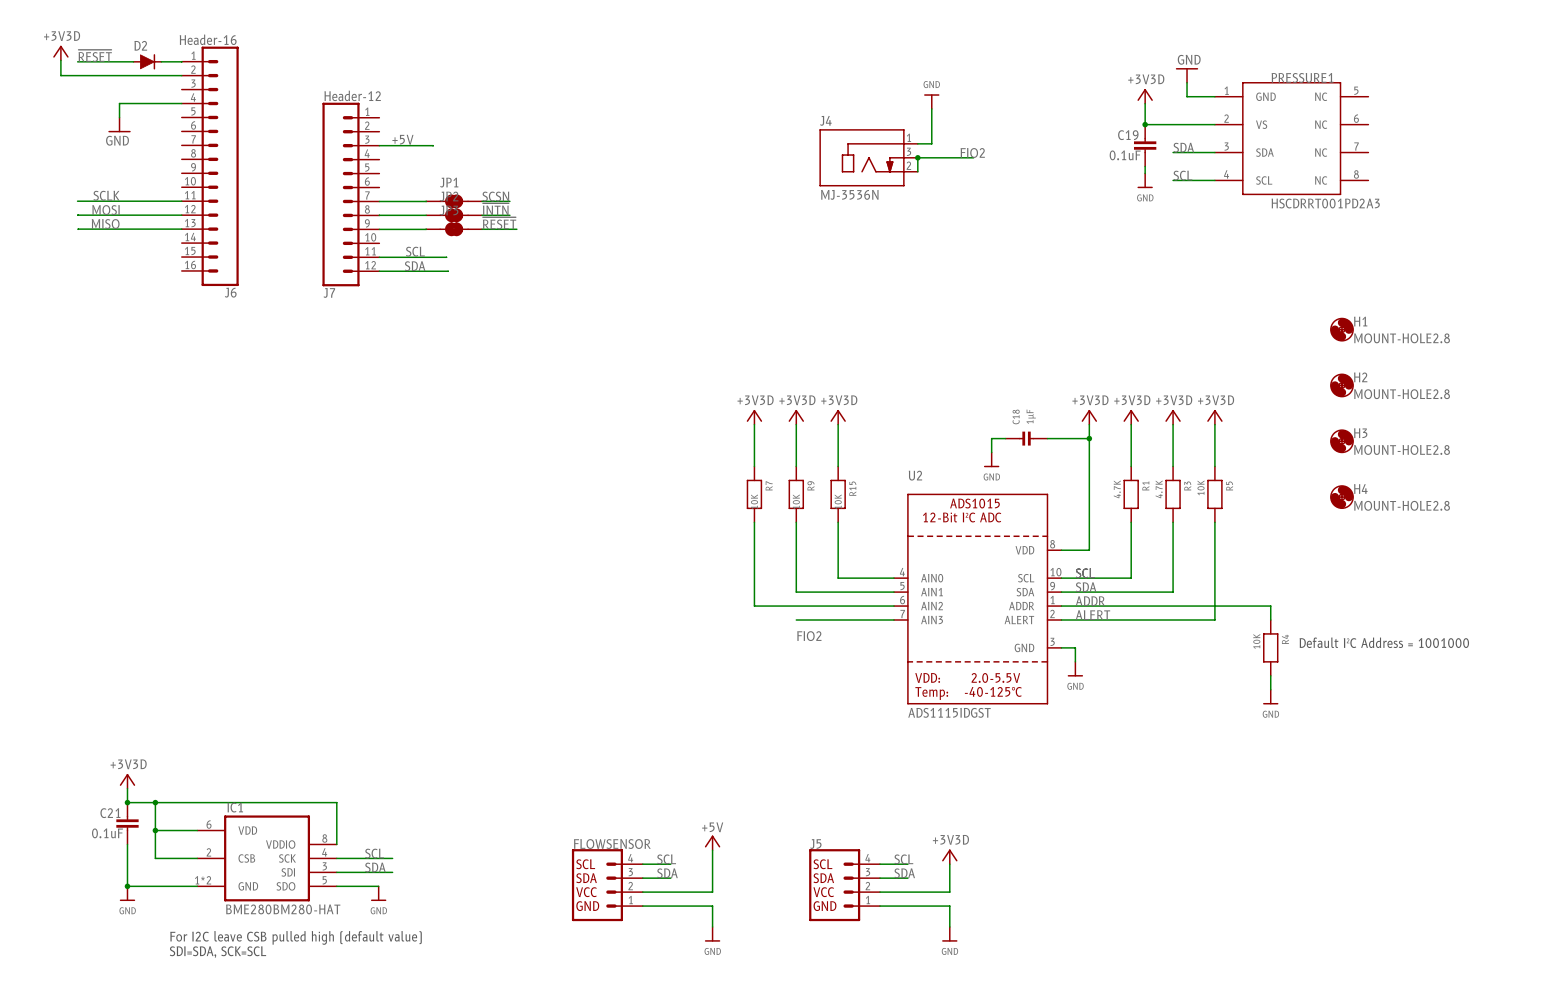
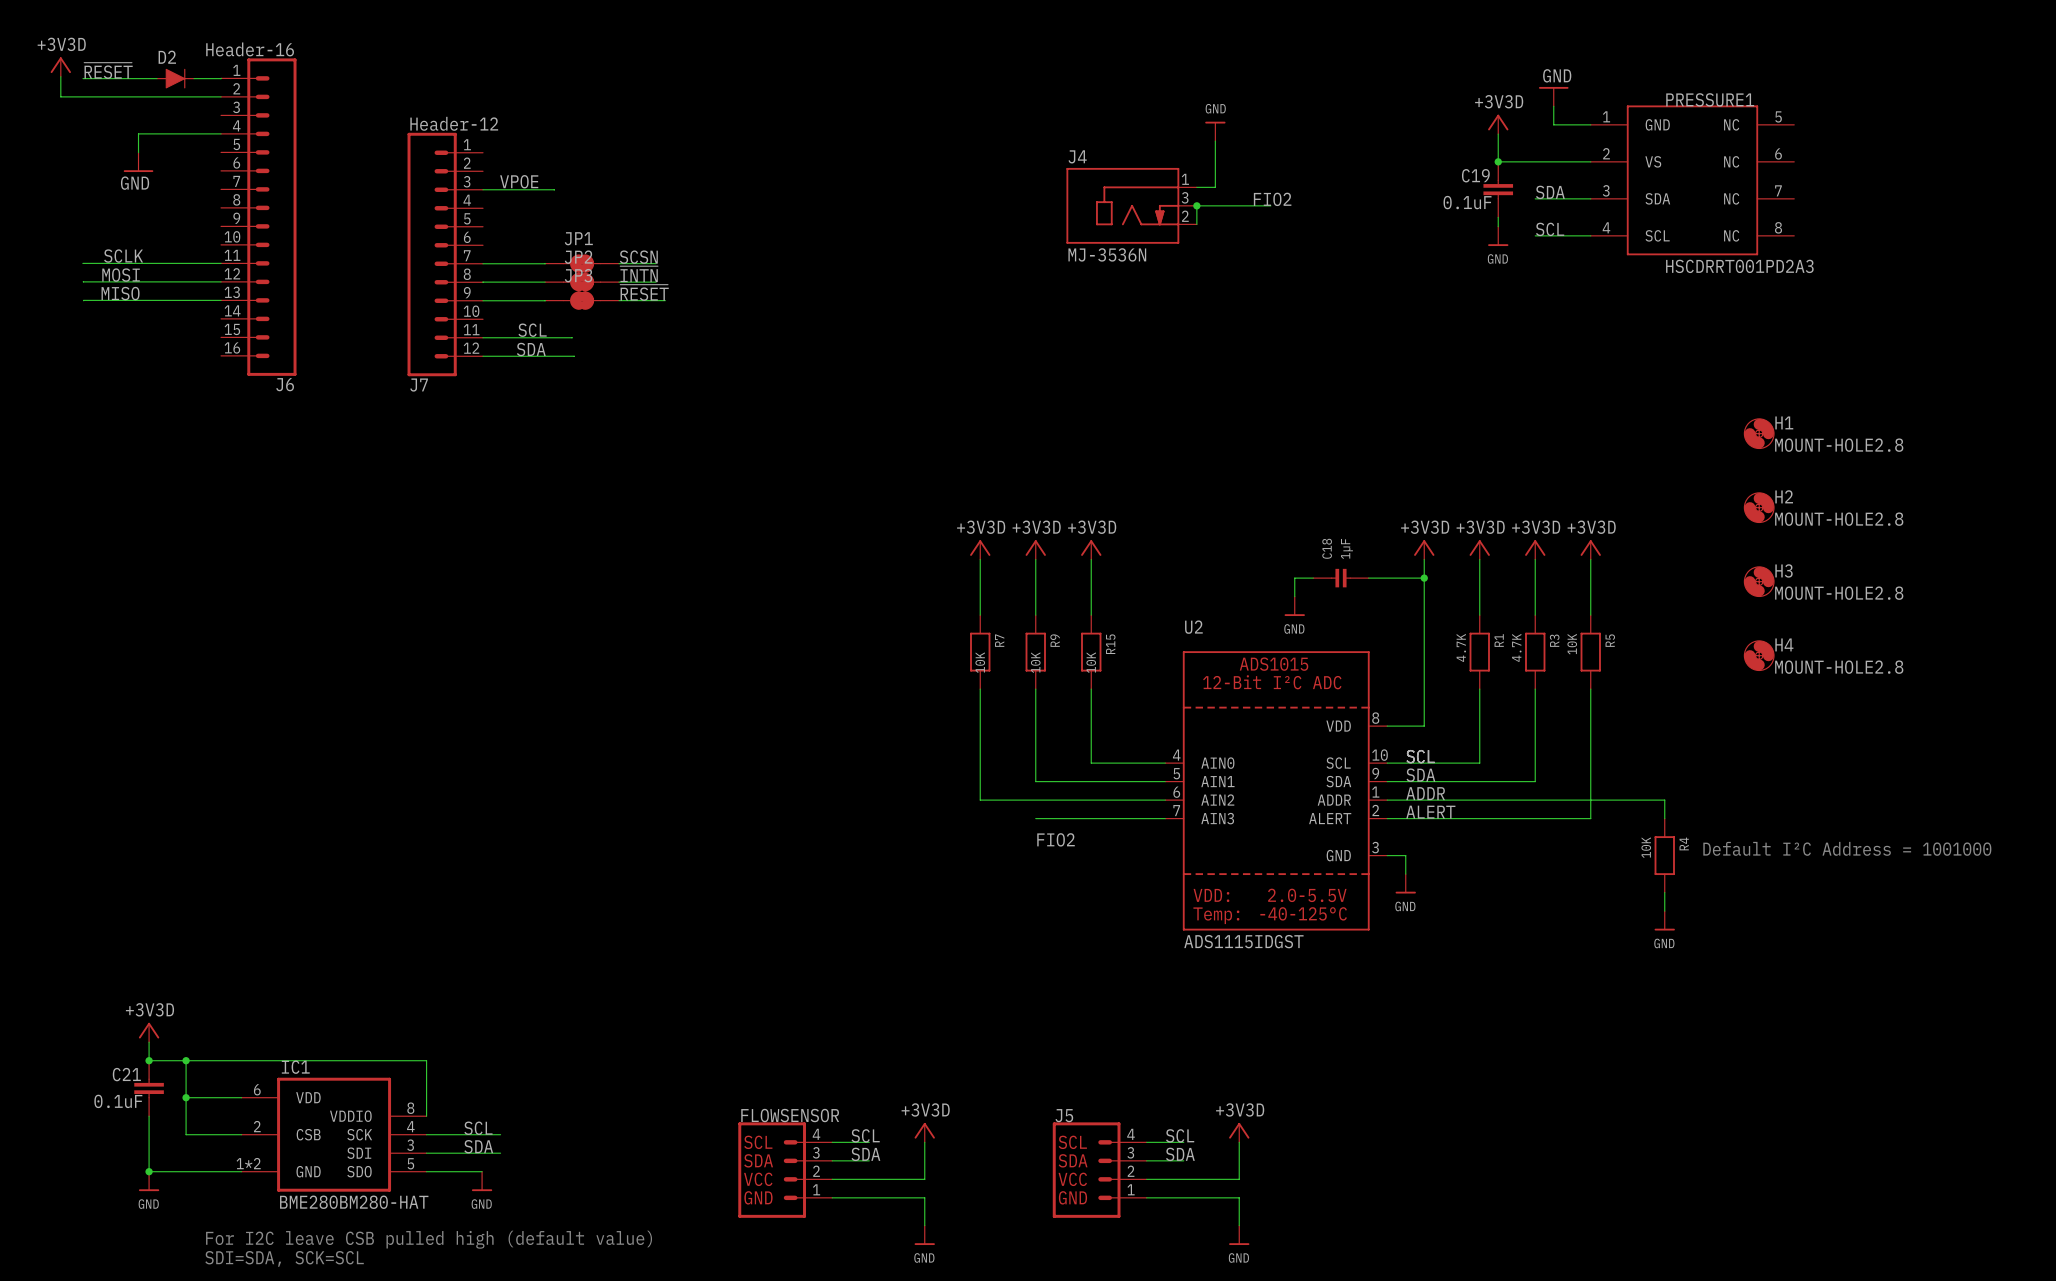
label: +5V (402, 139) -> VPOE (519, 181)
power symbol: +5V (712, 842) -> none
power symbol: none -> +3V3D (924, 1132)

